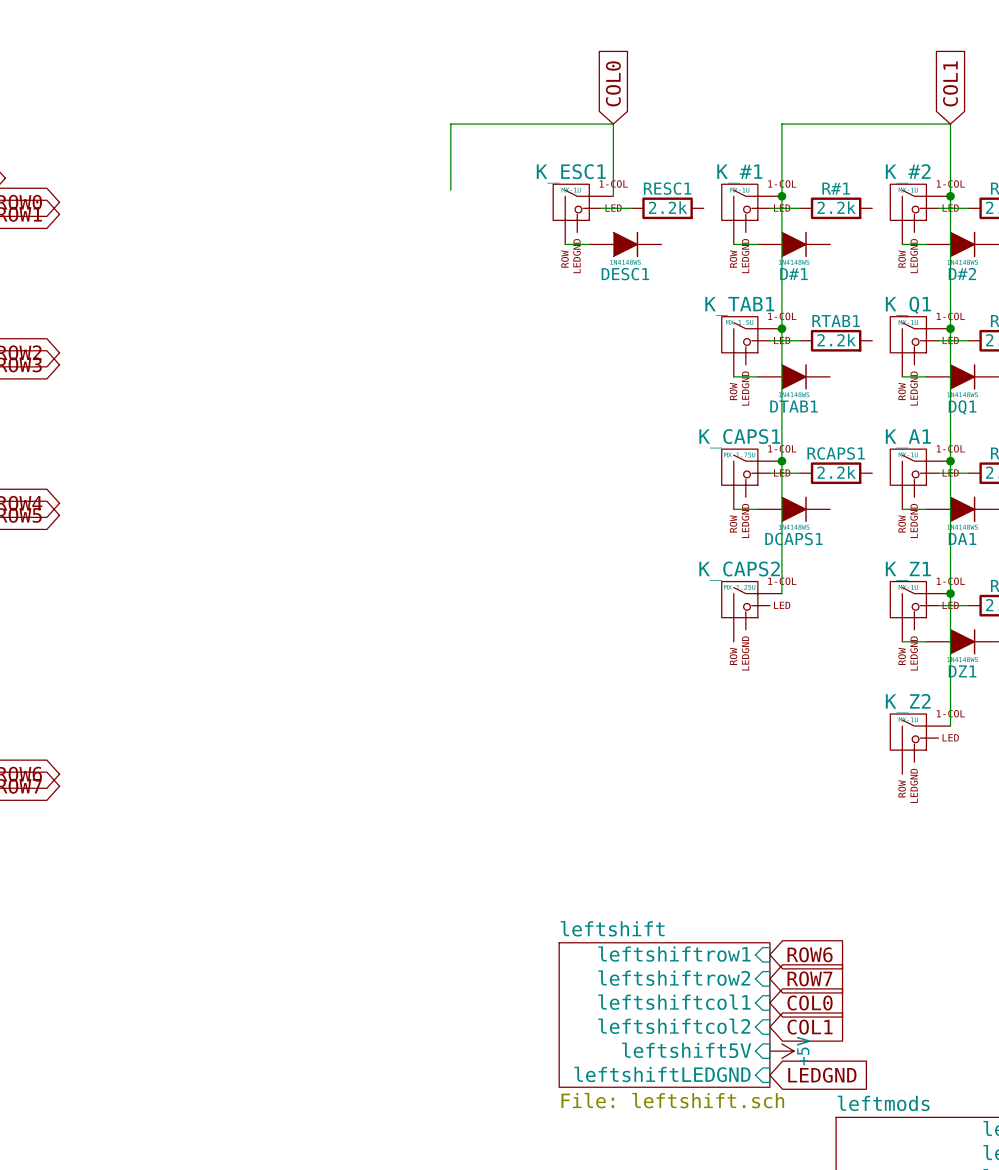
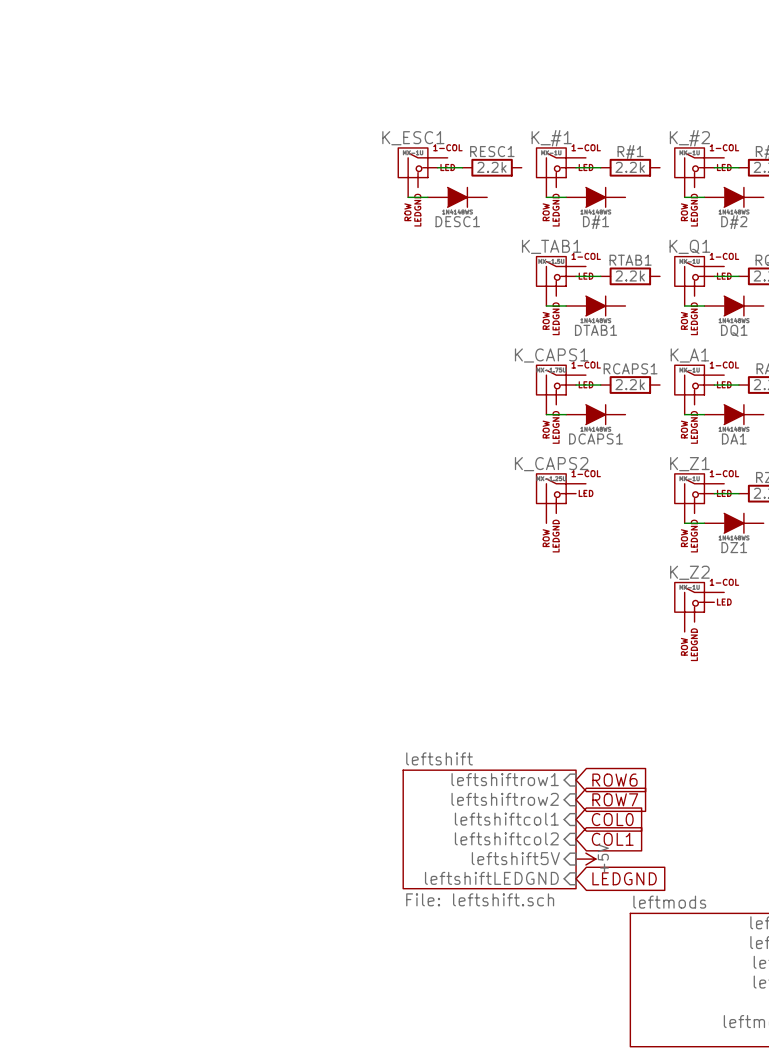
global label: COL0 (613, 83) -> none
global label: COL1 (950, 83) -> none
wire: (450, 190) (450, 124) (613, 124) (613, 196) -> none
junction: (781, 196) -> none
junction: (950, 196) -> none
junction: (781, 328) -> none
junction: (950, 328) -> none
junction: (781, 461) -> none
junction: (950, 461) -> none
wire: (781, 593) (781, 124) (950, 124) (950, 726) -> none
junction: (950, 593) -> none

